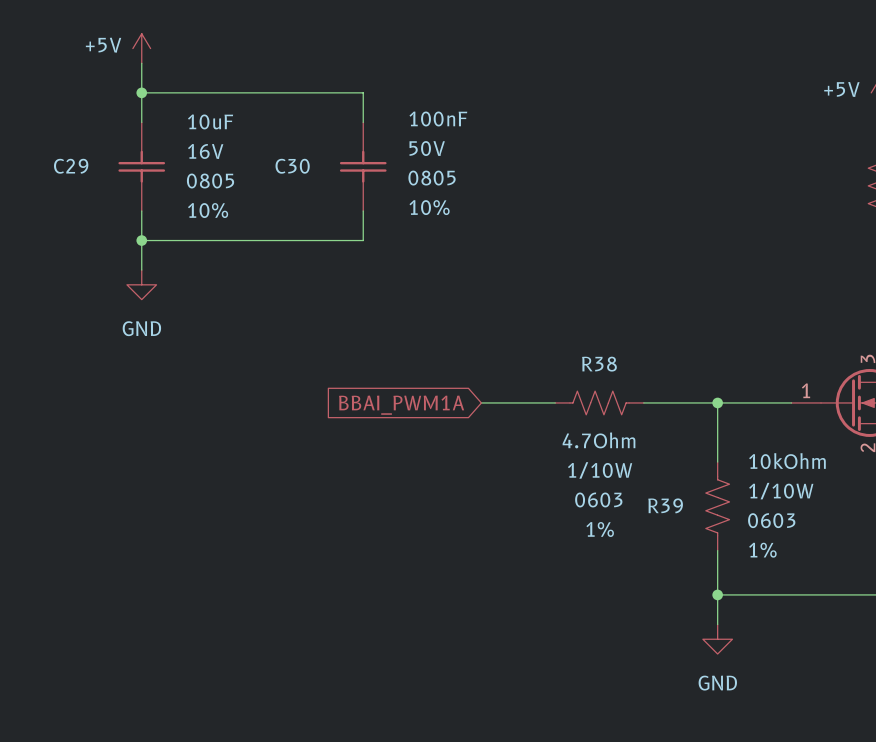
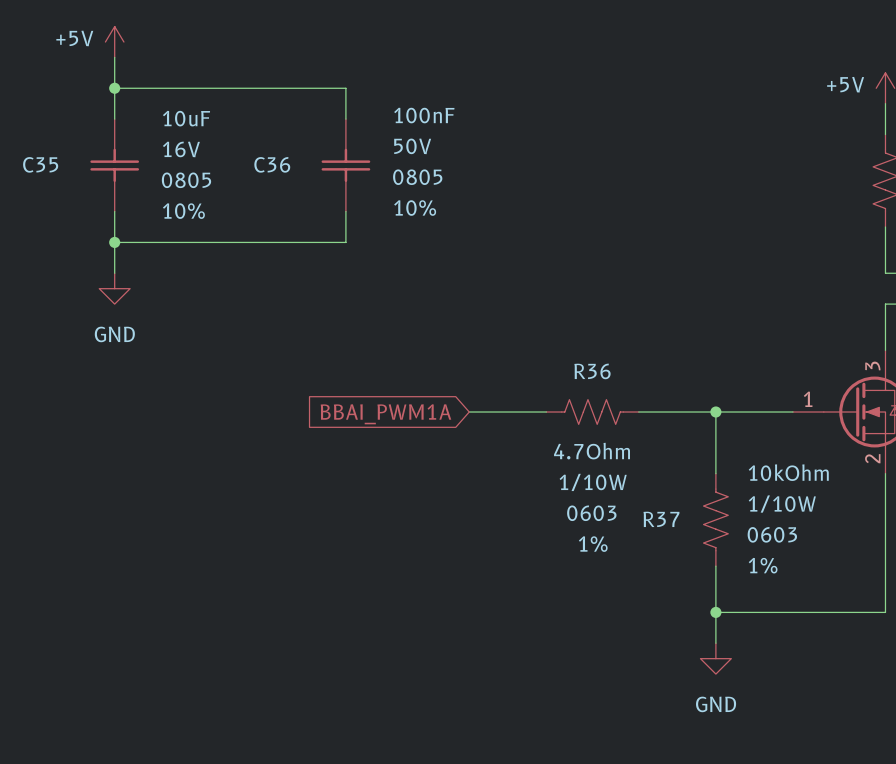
C29 name: C29 (71, 166) -> C35 (40, 164)
C30 name: C30 (292, 166) -> C36 (272, 164)
R38 name: R38 (599, 364) -> R36 (592, 371)
R39 name: R39 (665, 505) -> R37 (661, 519)

